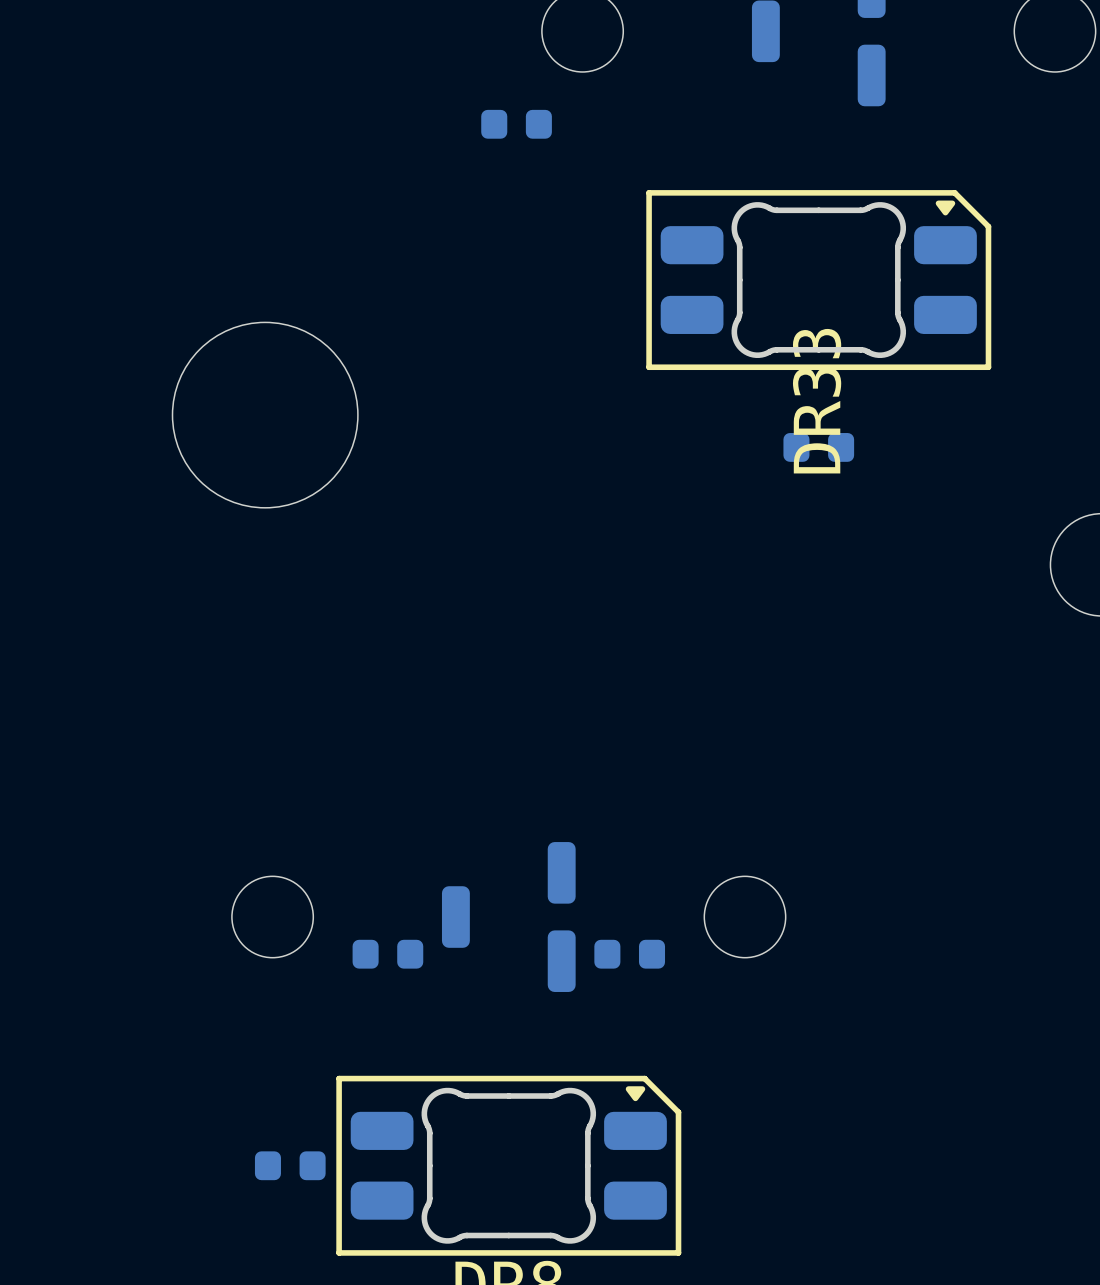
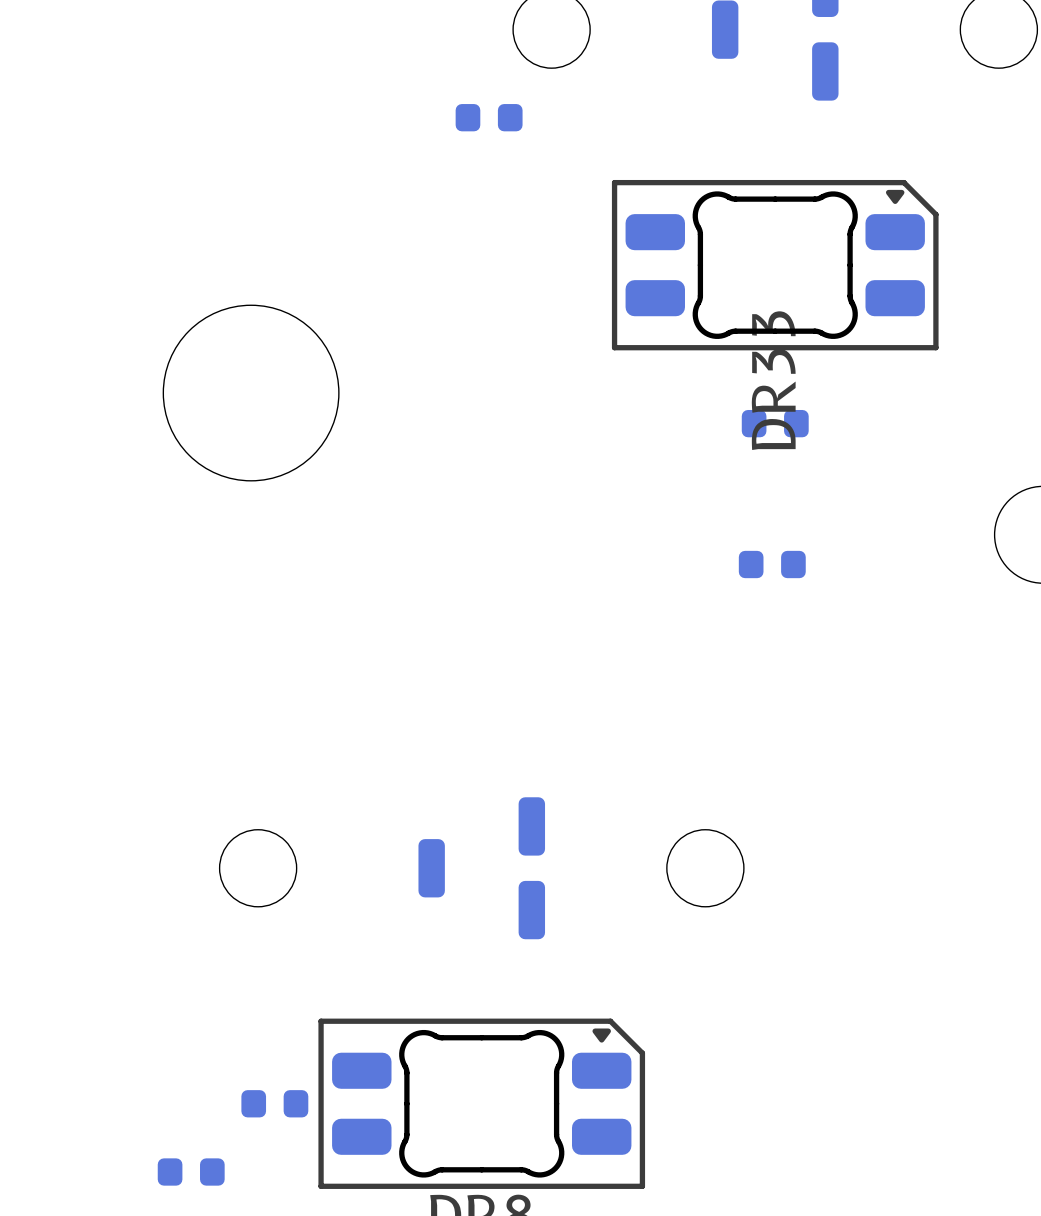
part: none -> (772, 564)
part: (387, 954) -> none
part: (629, 954) -> none
part: none -> (191, 1172)

